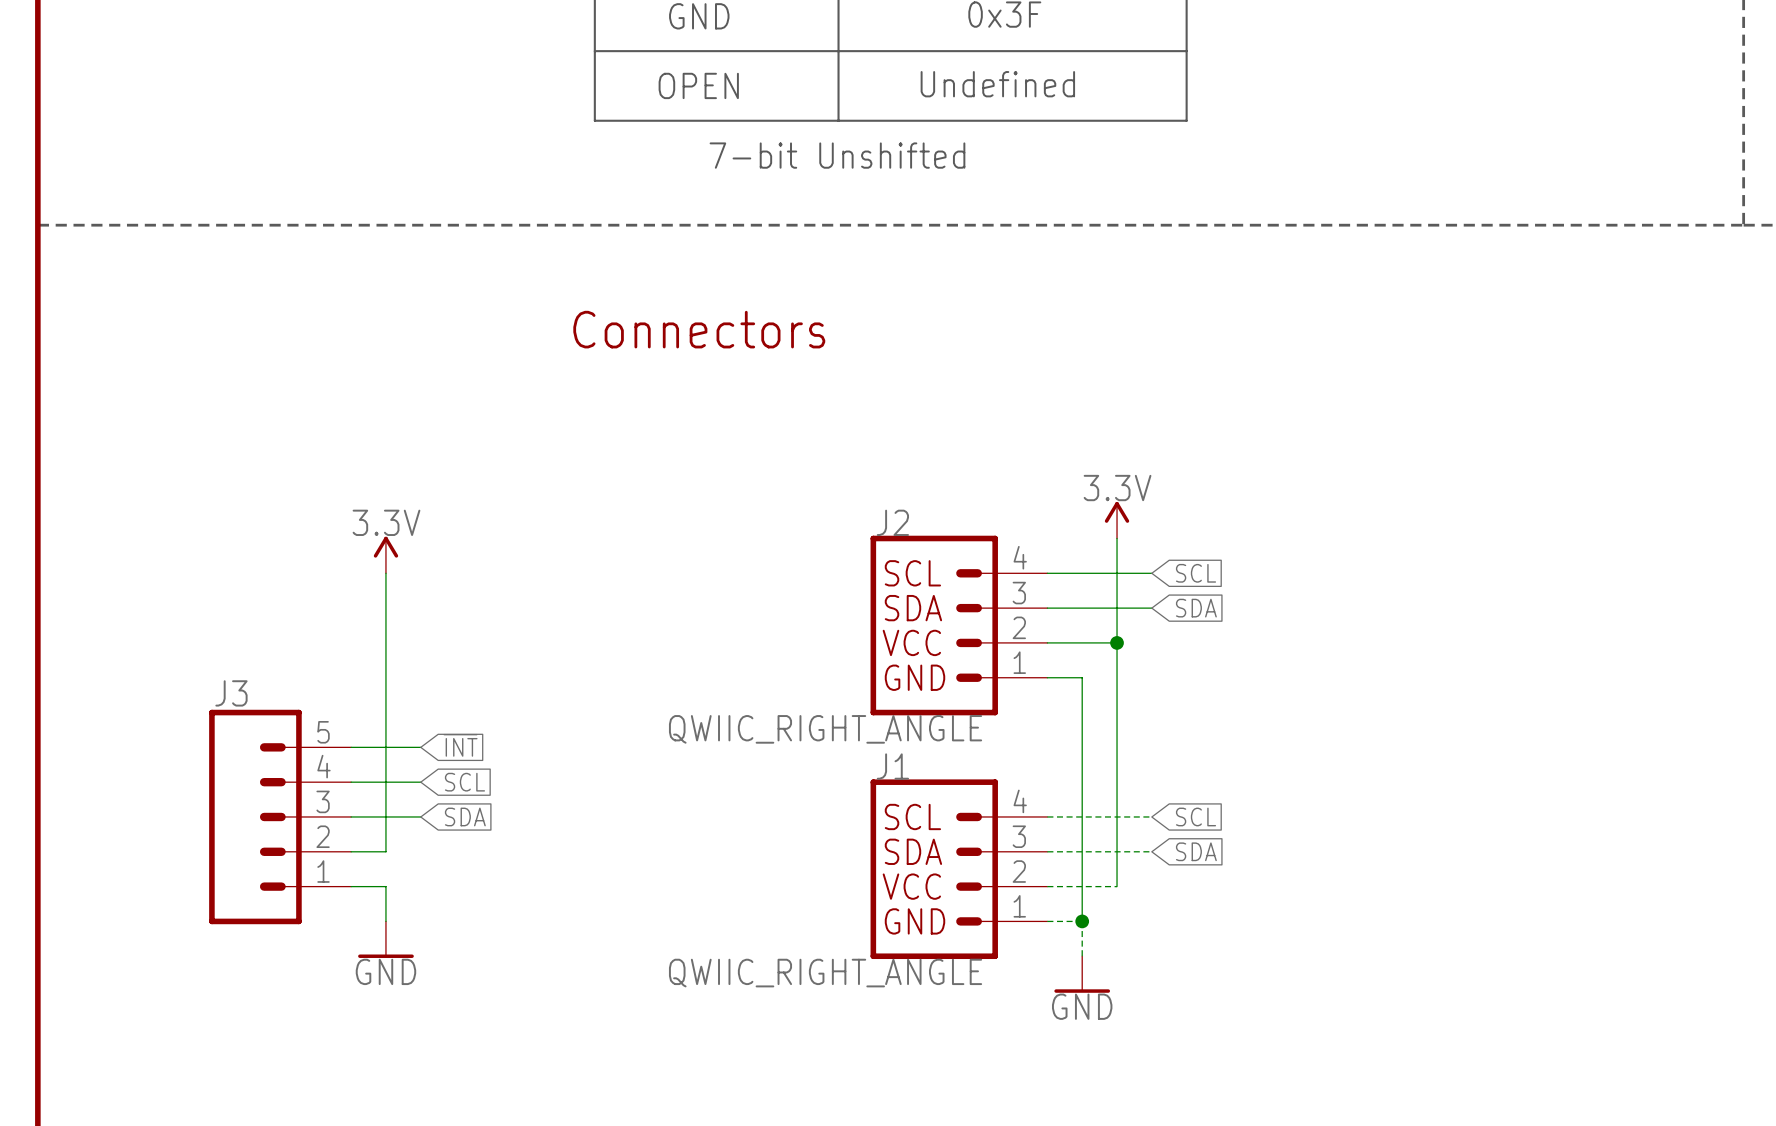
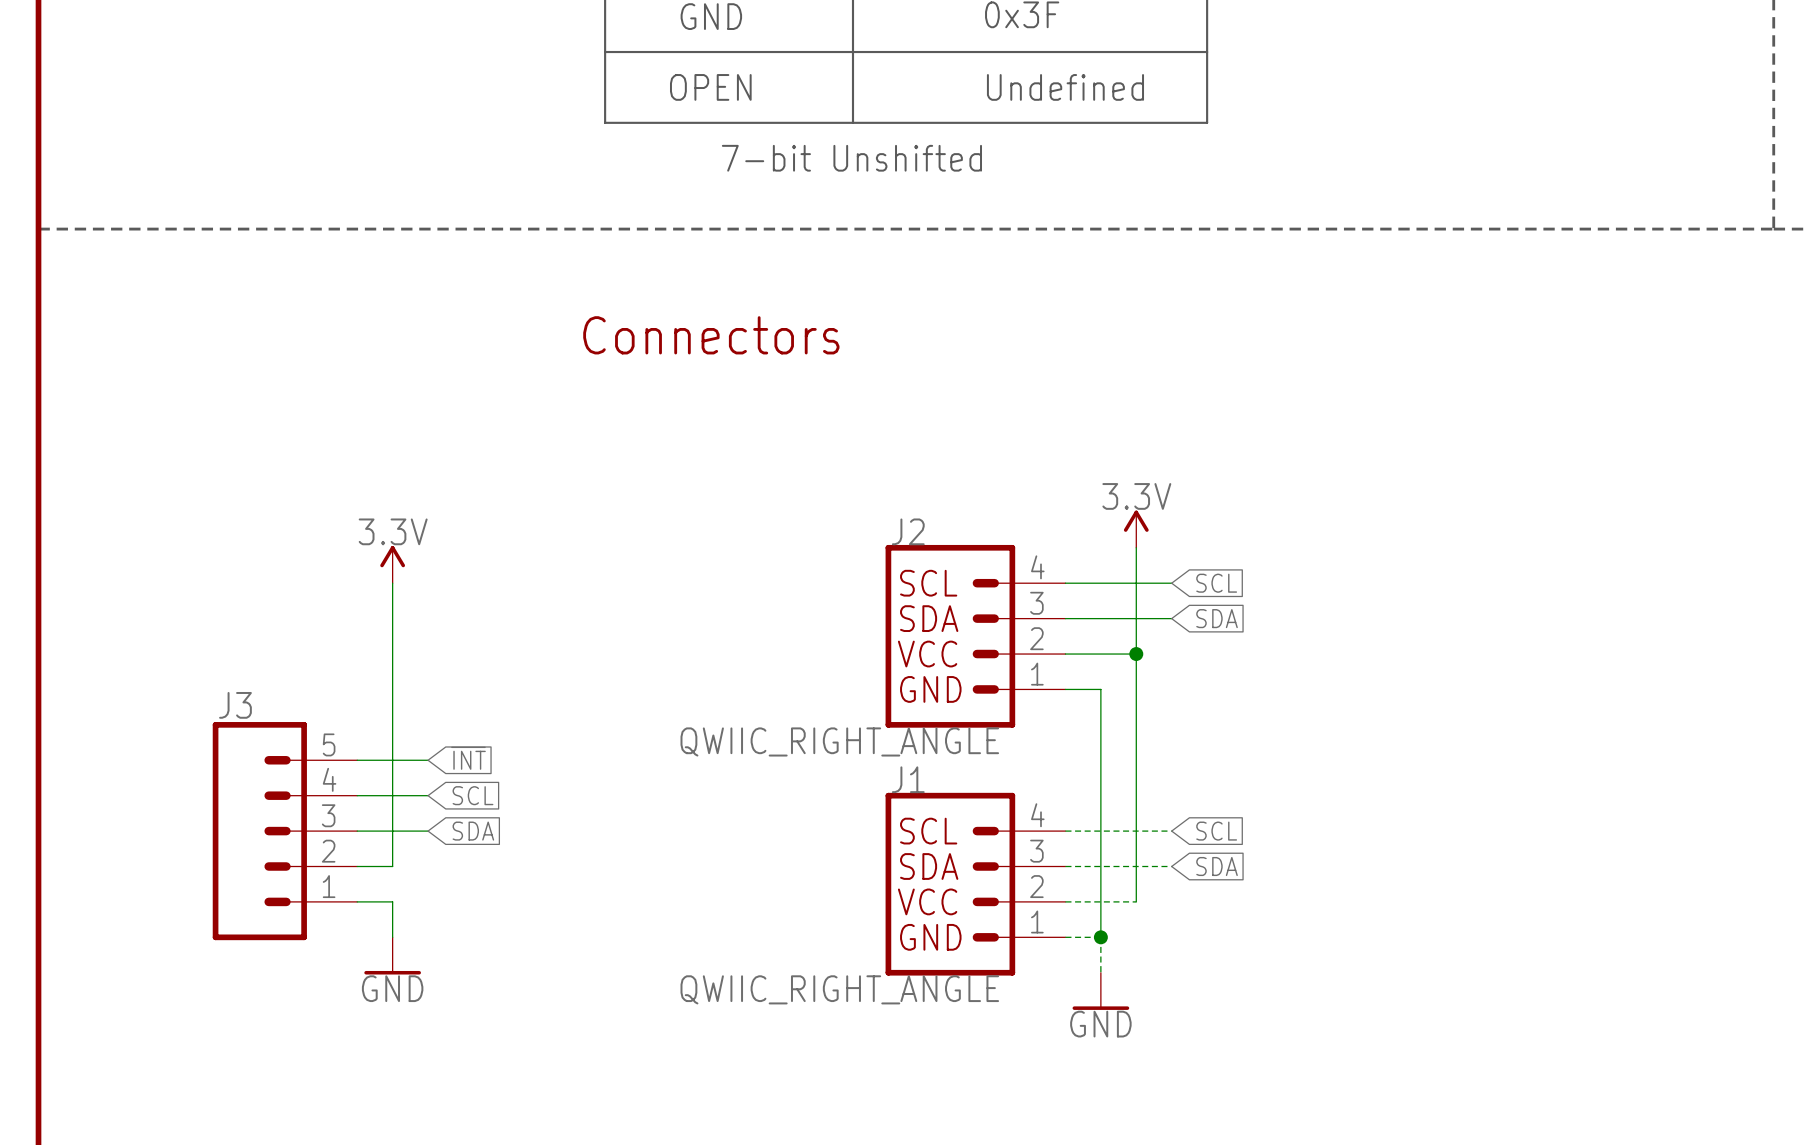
text position: Undefined (997, 84) -> Undefined (1065, 87)

